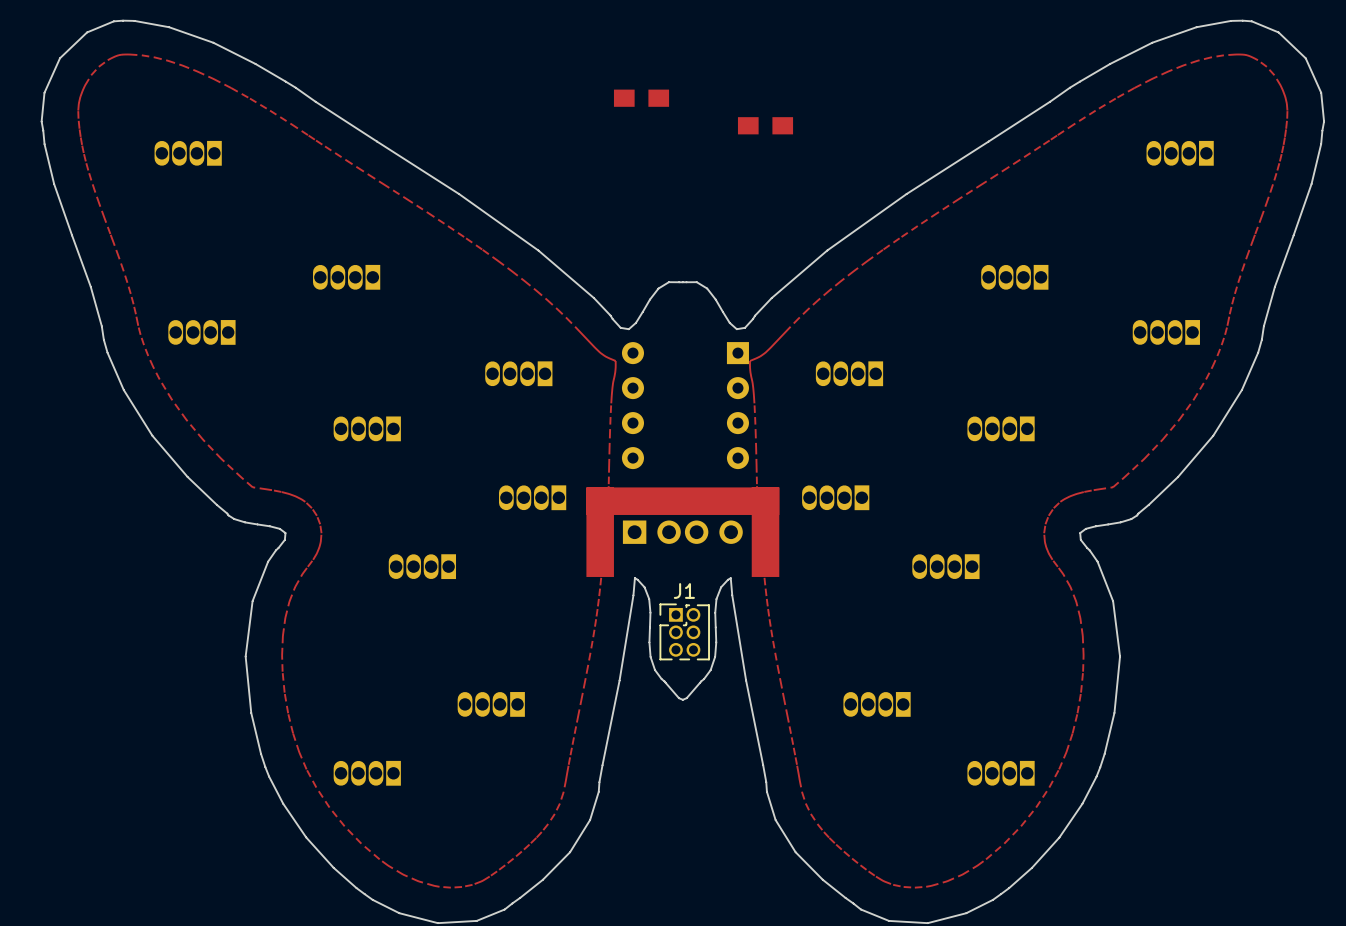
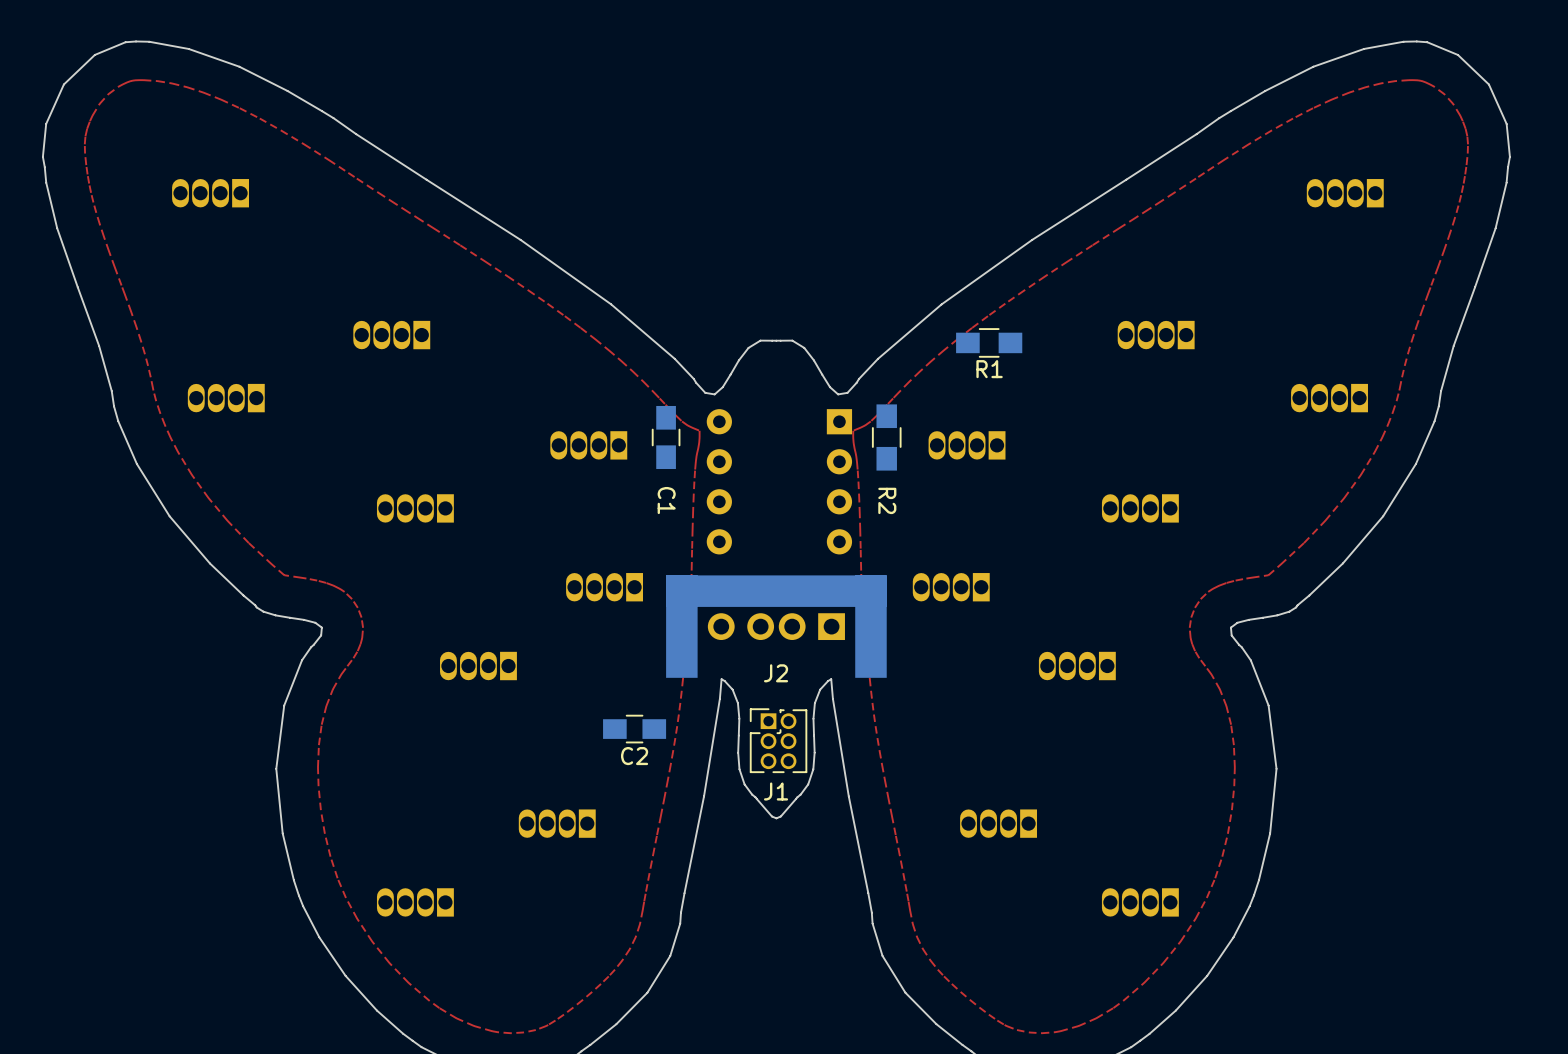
part: (641, 98) -> none
C1 side: top (765, 125) -> bottom (666, 437)
R1: none -> (989, 342)
R2: none -> (886, 437)
J2 side: top (682, 532) -> bottom (776, 626)
J1 name position: J1 (684, 590) -> J1 (776, 791)
C2: none -> (634, 729)

